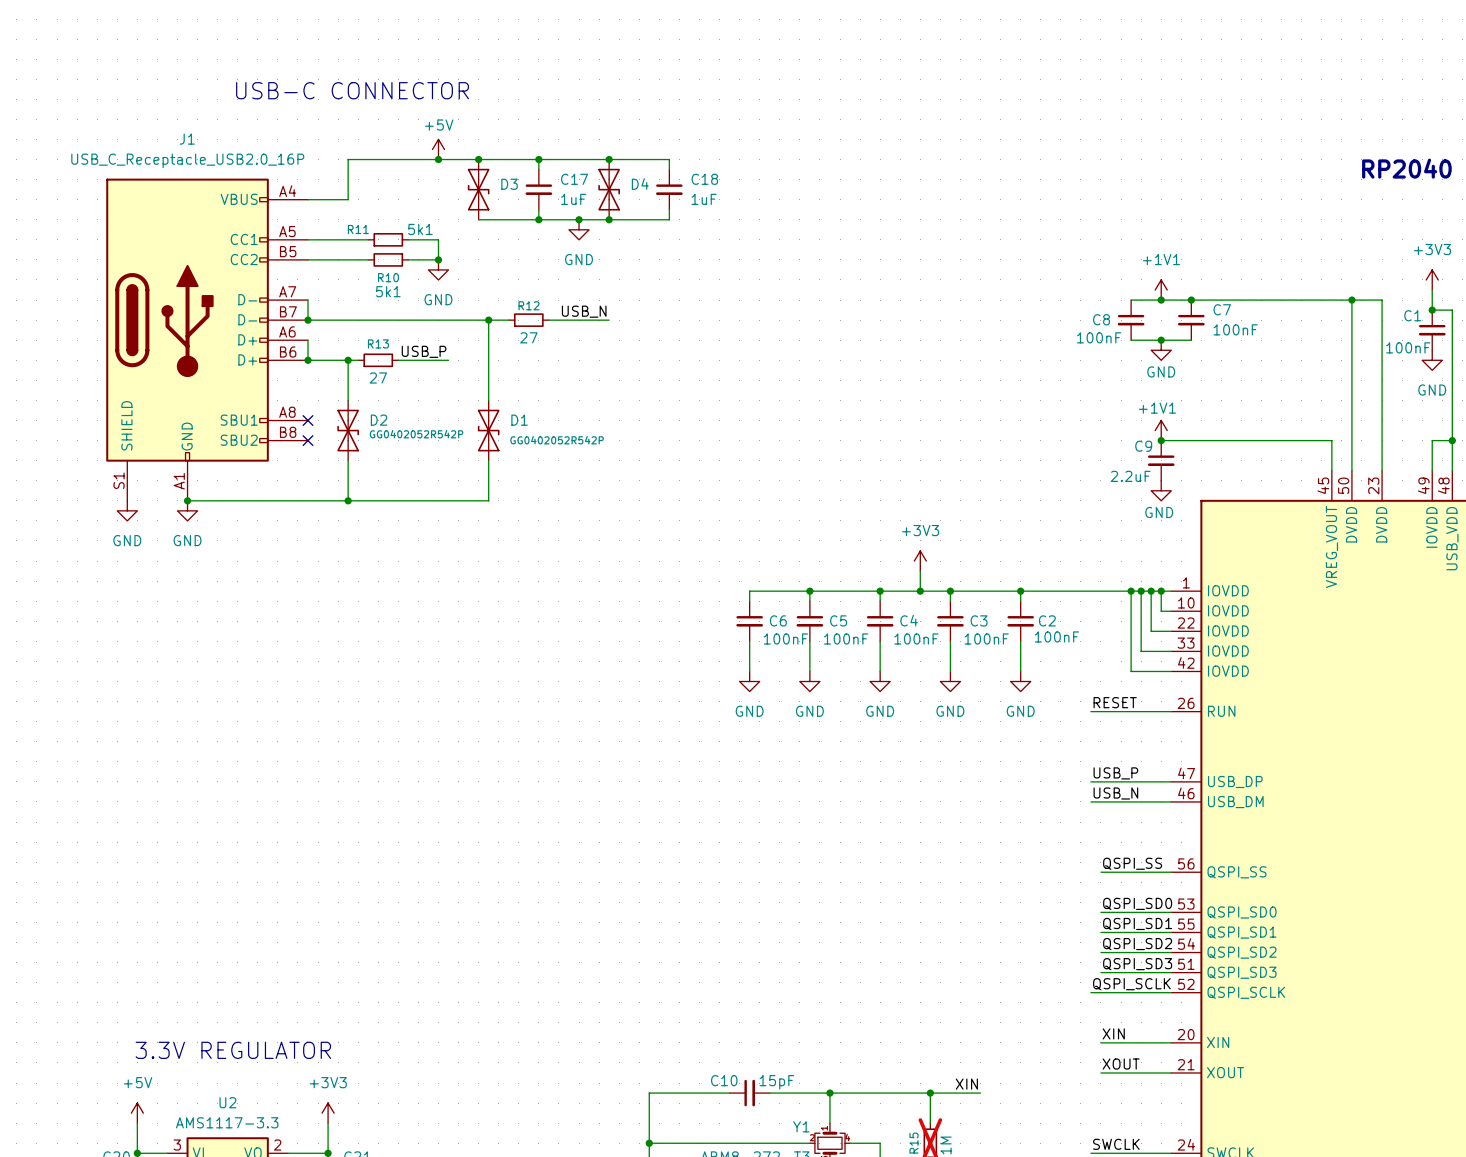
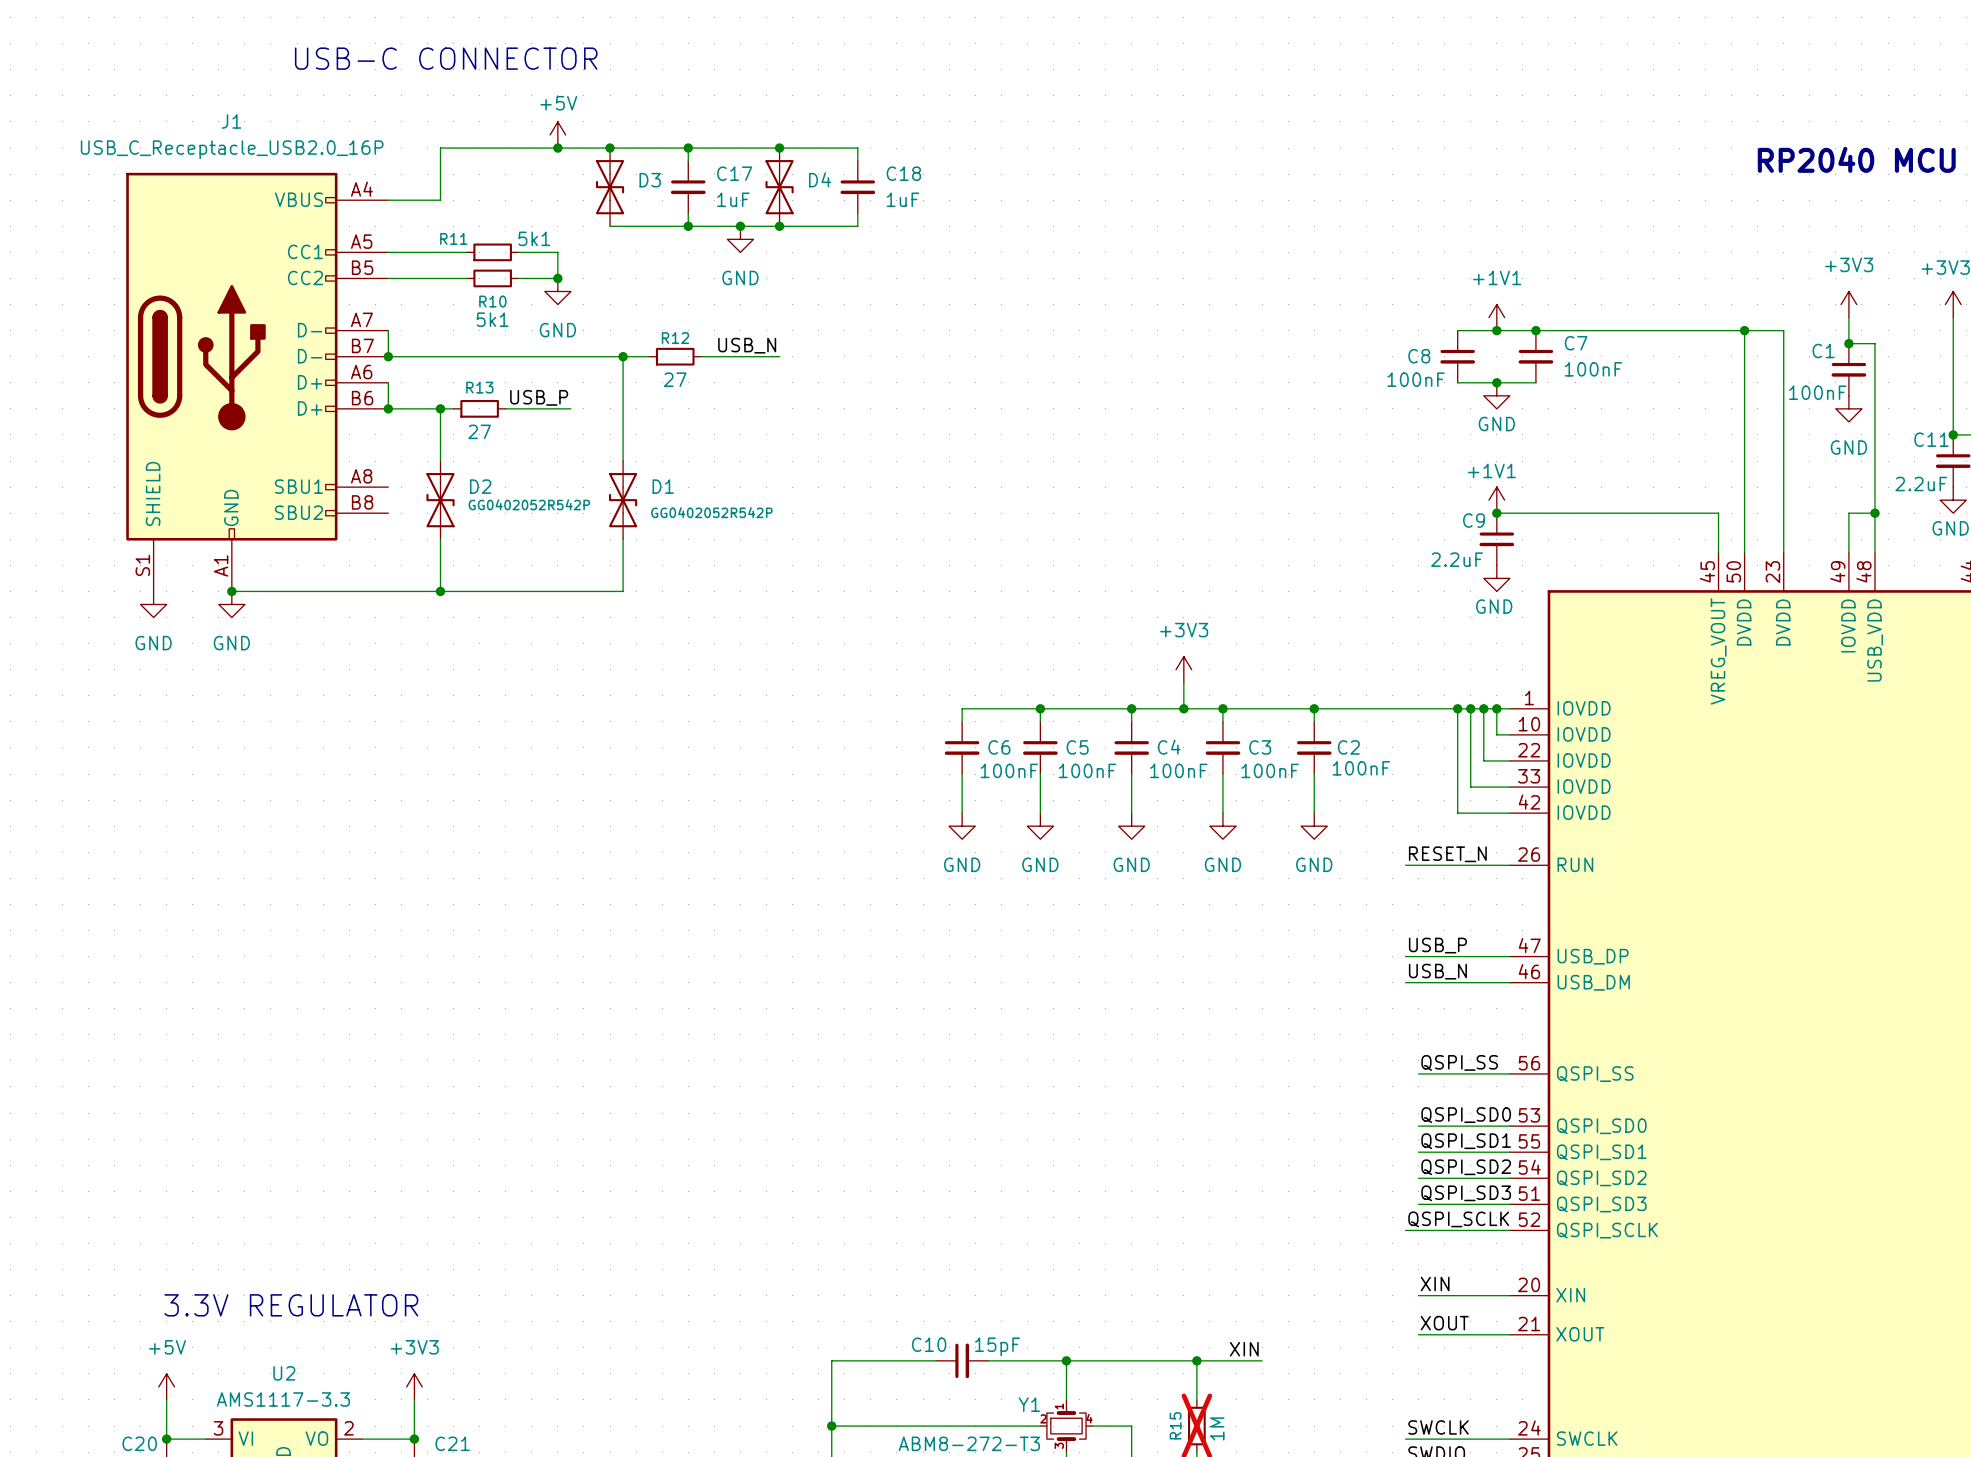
no-connect mark: (307, 420) -> none
no-connect mark: (307, 440) -> none
label: RESET (1115, 702) -> RESET_N (1447, 854)

